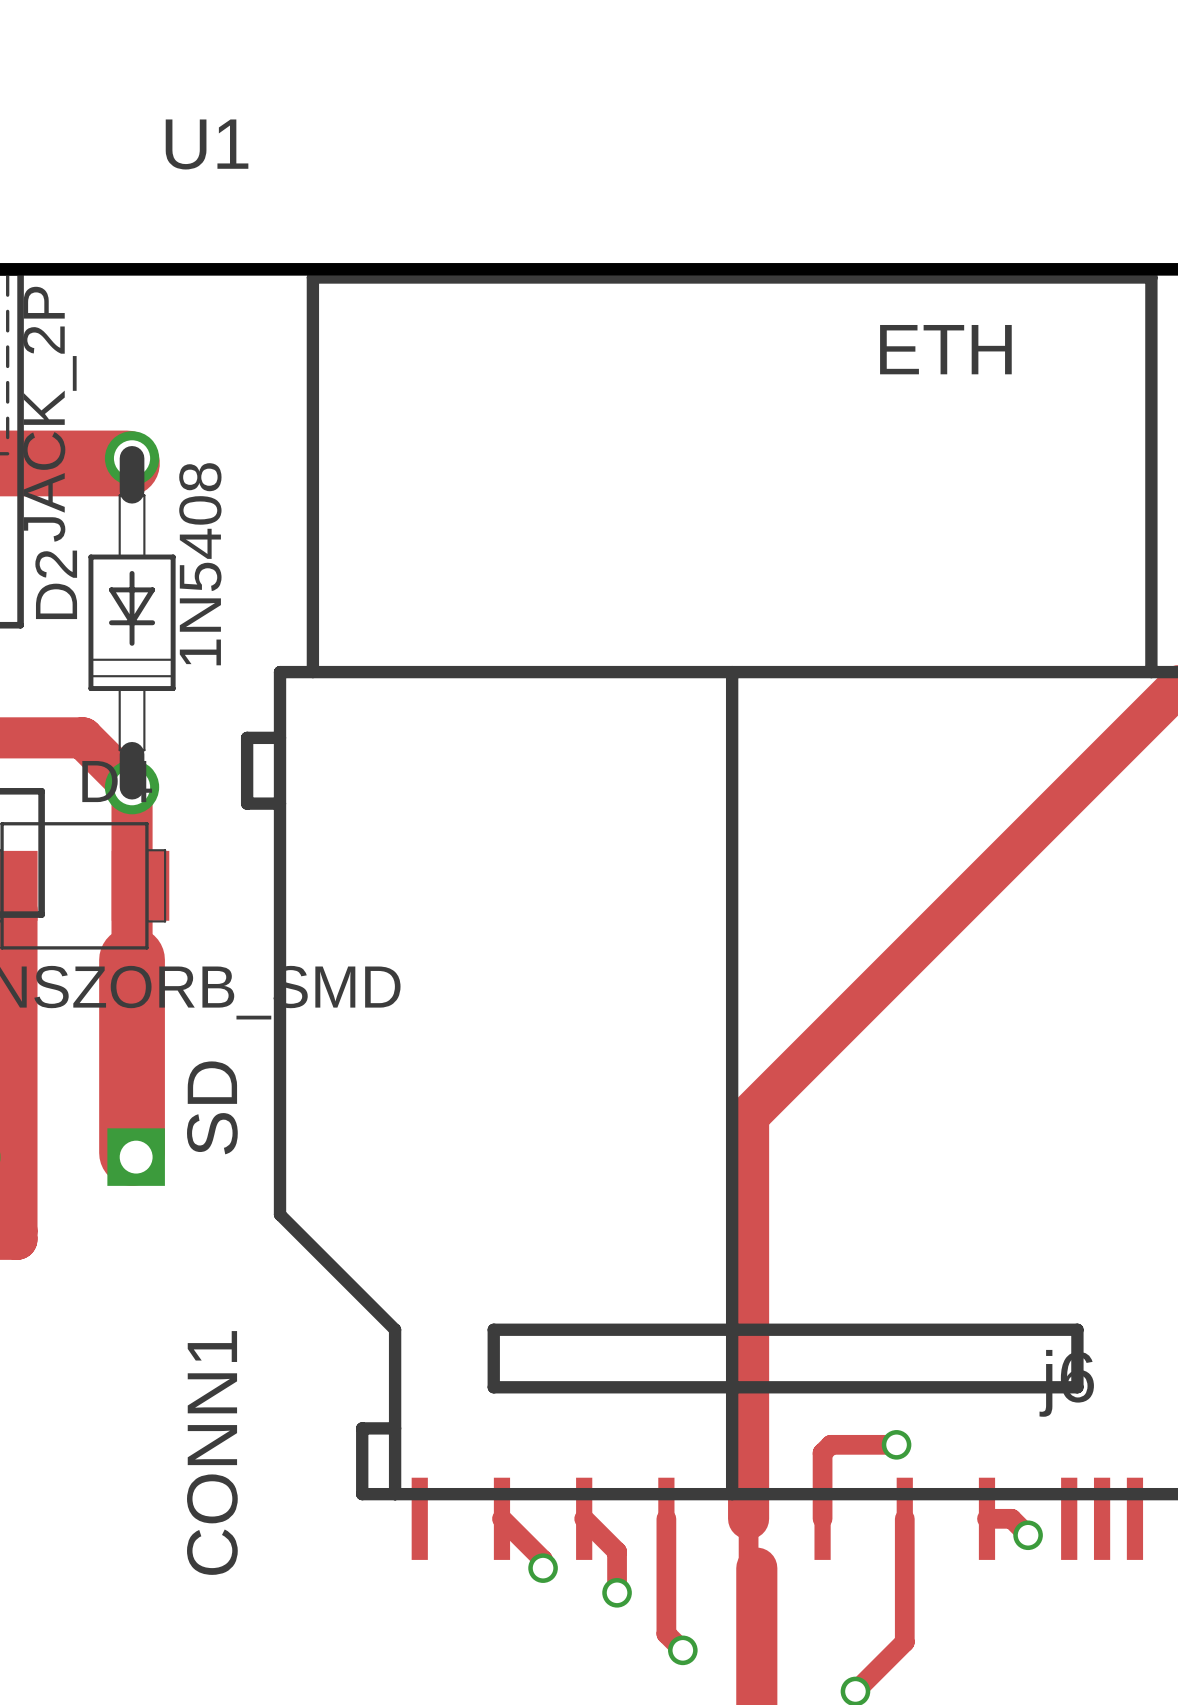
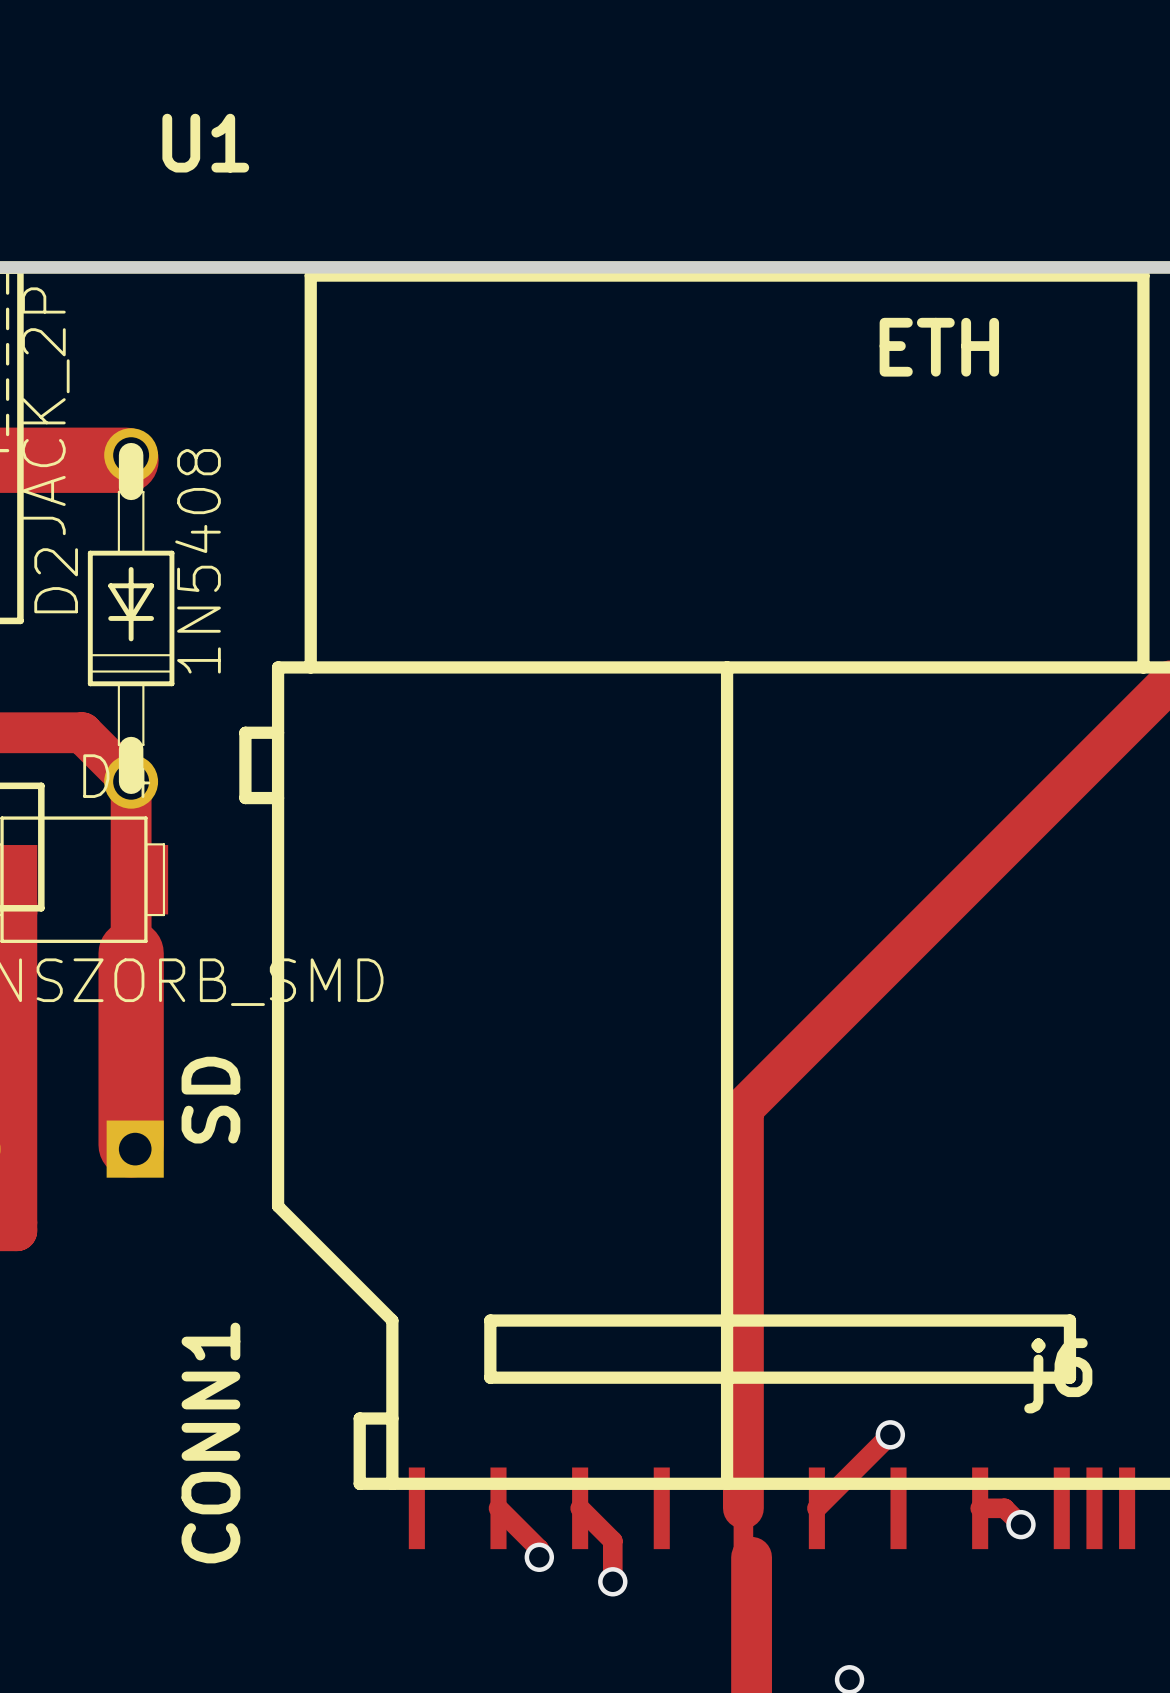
track: (896, 1444) (830, 1444) (822, 1453) (822, 1518) -> (890, 1434) (816, 1508)
track: (666, 1518) (666, 1633) (682, 1650) -> none
track: (904, 1518) (904, 1642) (855, 1691) -> none
via: (682, 1650) -> none

